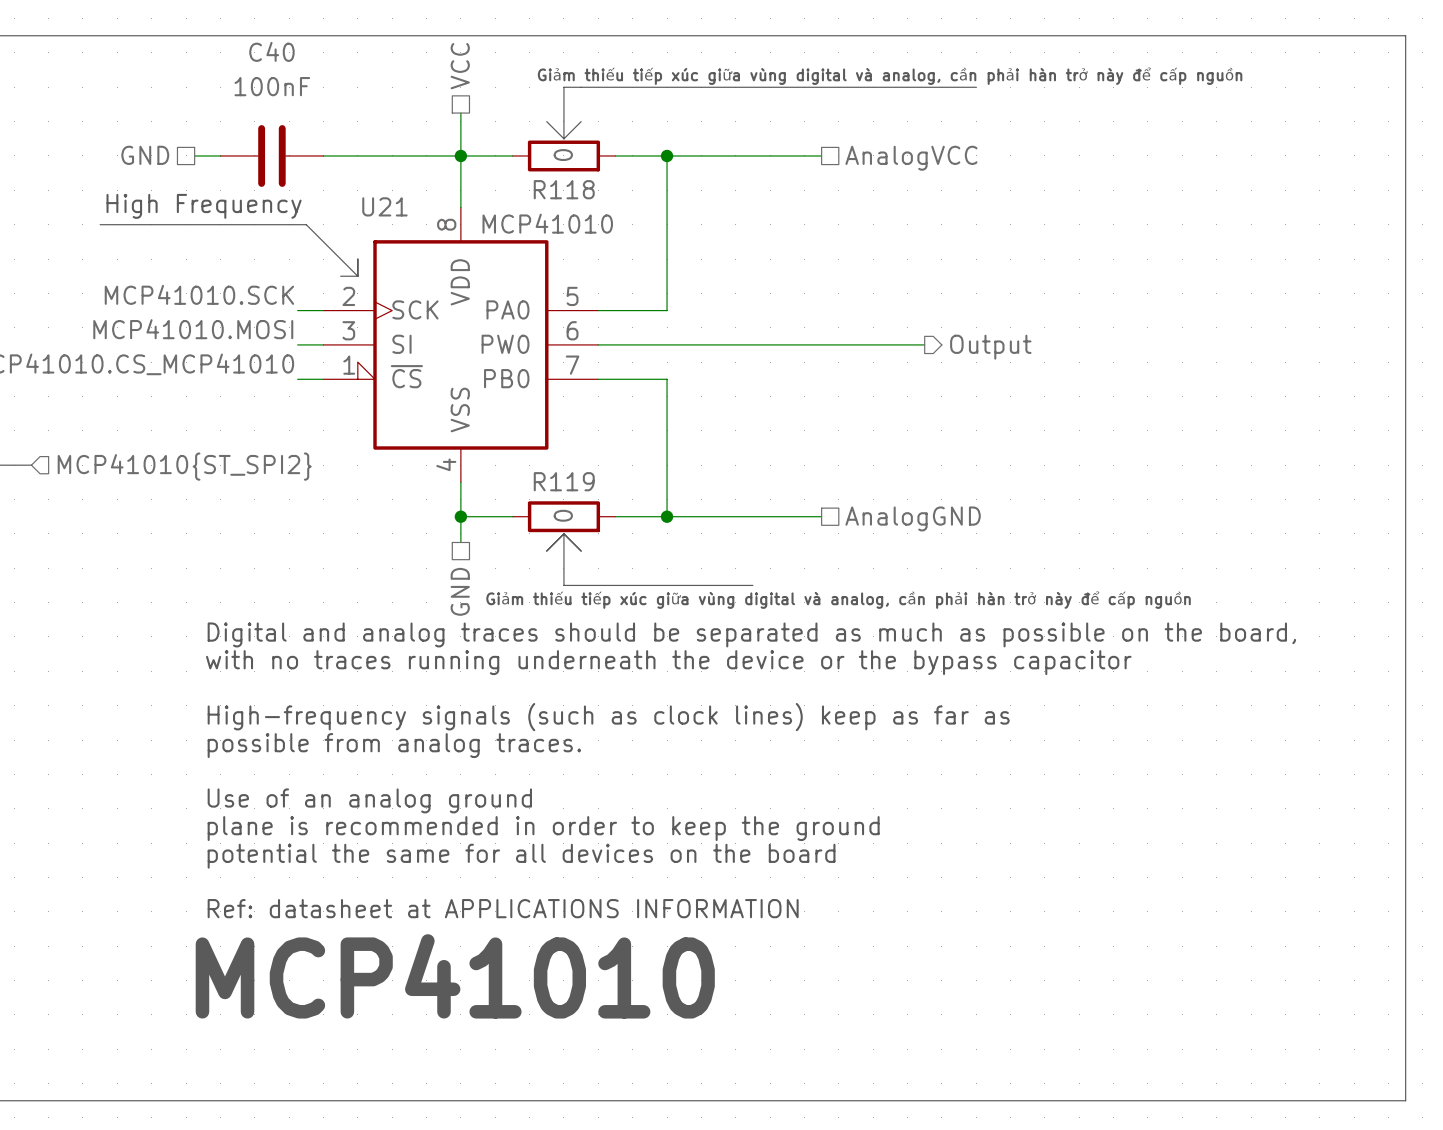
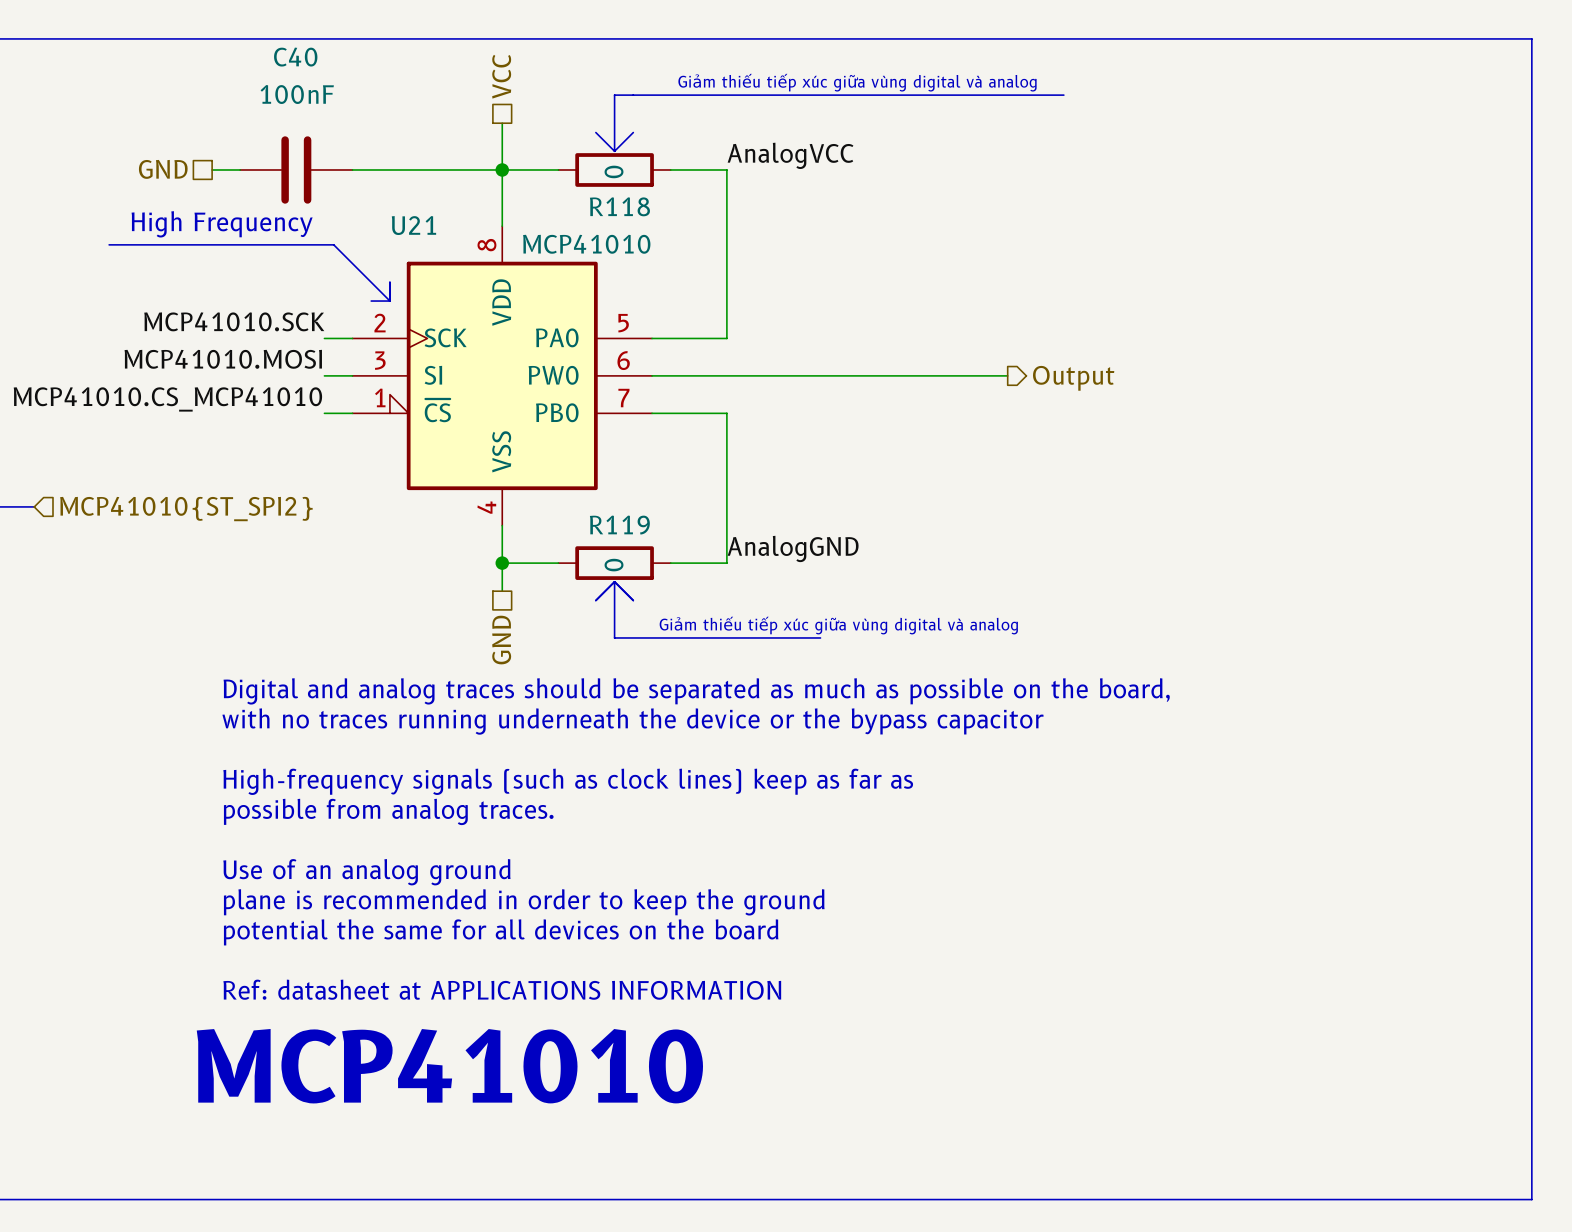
text: Giảm thiếu tiếp xúc giữa vùng digital và analog, cần phải hàn trở này để cấp nguồn (890, 75) -> Giảm thiếu tiếp xúc giữa vùng digital và analog (857, 82)
label: none -> AnalogVCC (790, 155)
wire: (667, 155) (821, 155) -> none
junction: (667, 155) -> none
hierarchical label: AnalogVCC (911, 158) -> none
label: none -> AnalogGND (793, 548)
wire: (667, 516) (821, 516) -> none
junction: (667, 516) -> none
hierarchical label: AnalogGND (913, 518) -> none
text: none -> Giảm thiếu tiếp xúc giữa vùng digital và analog (838, 625)
text: Giảm thiếu tiếp xúc giữa vùng digital và analog, cần phải hàn trở này để cấp nguồn (838, 599) -> none

